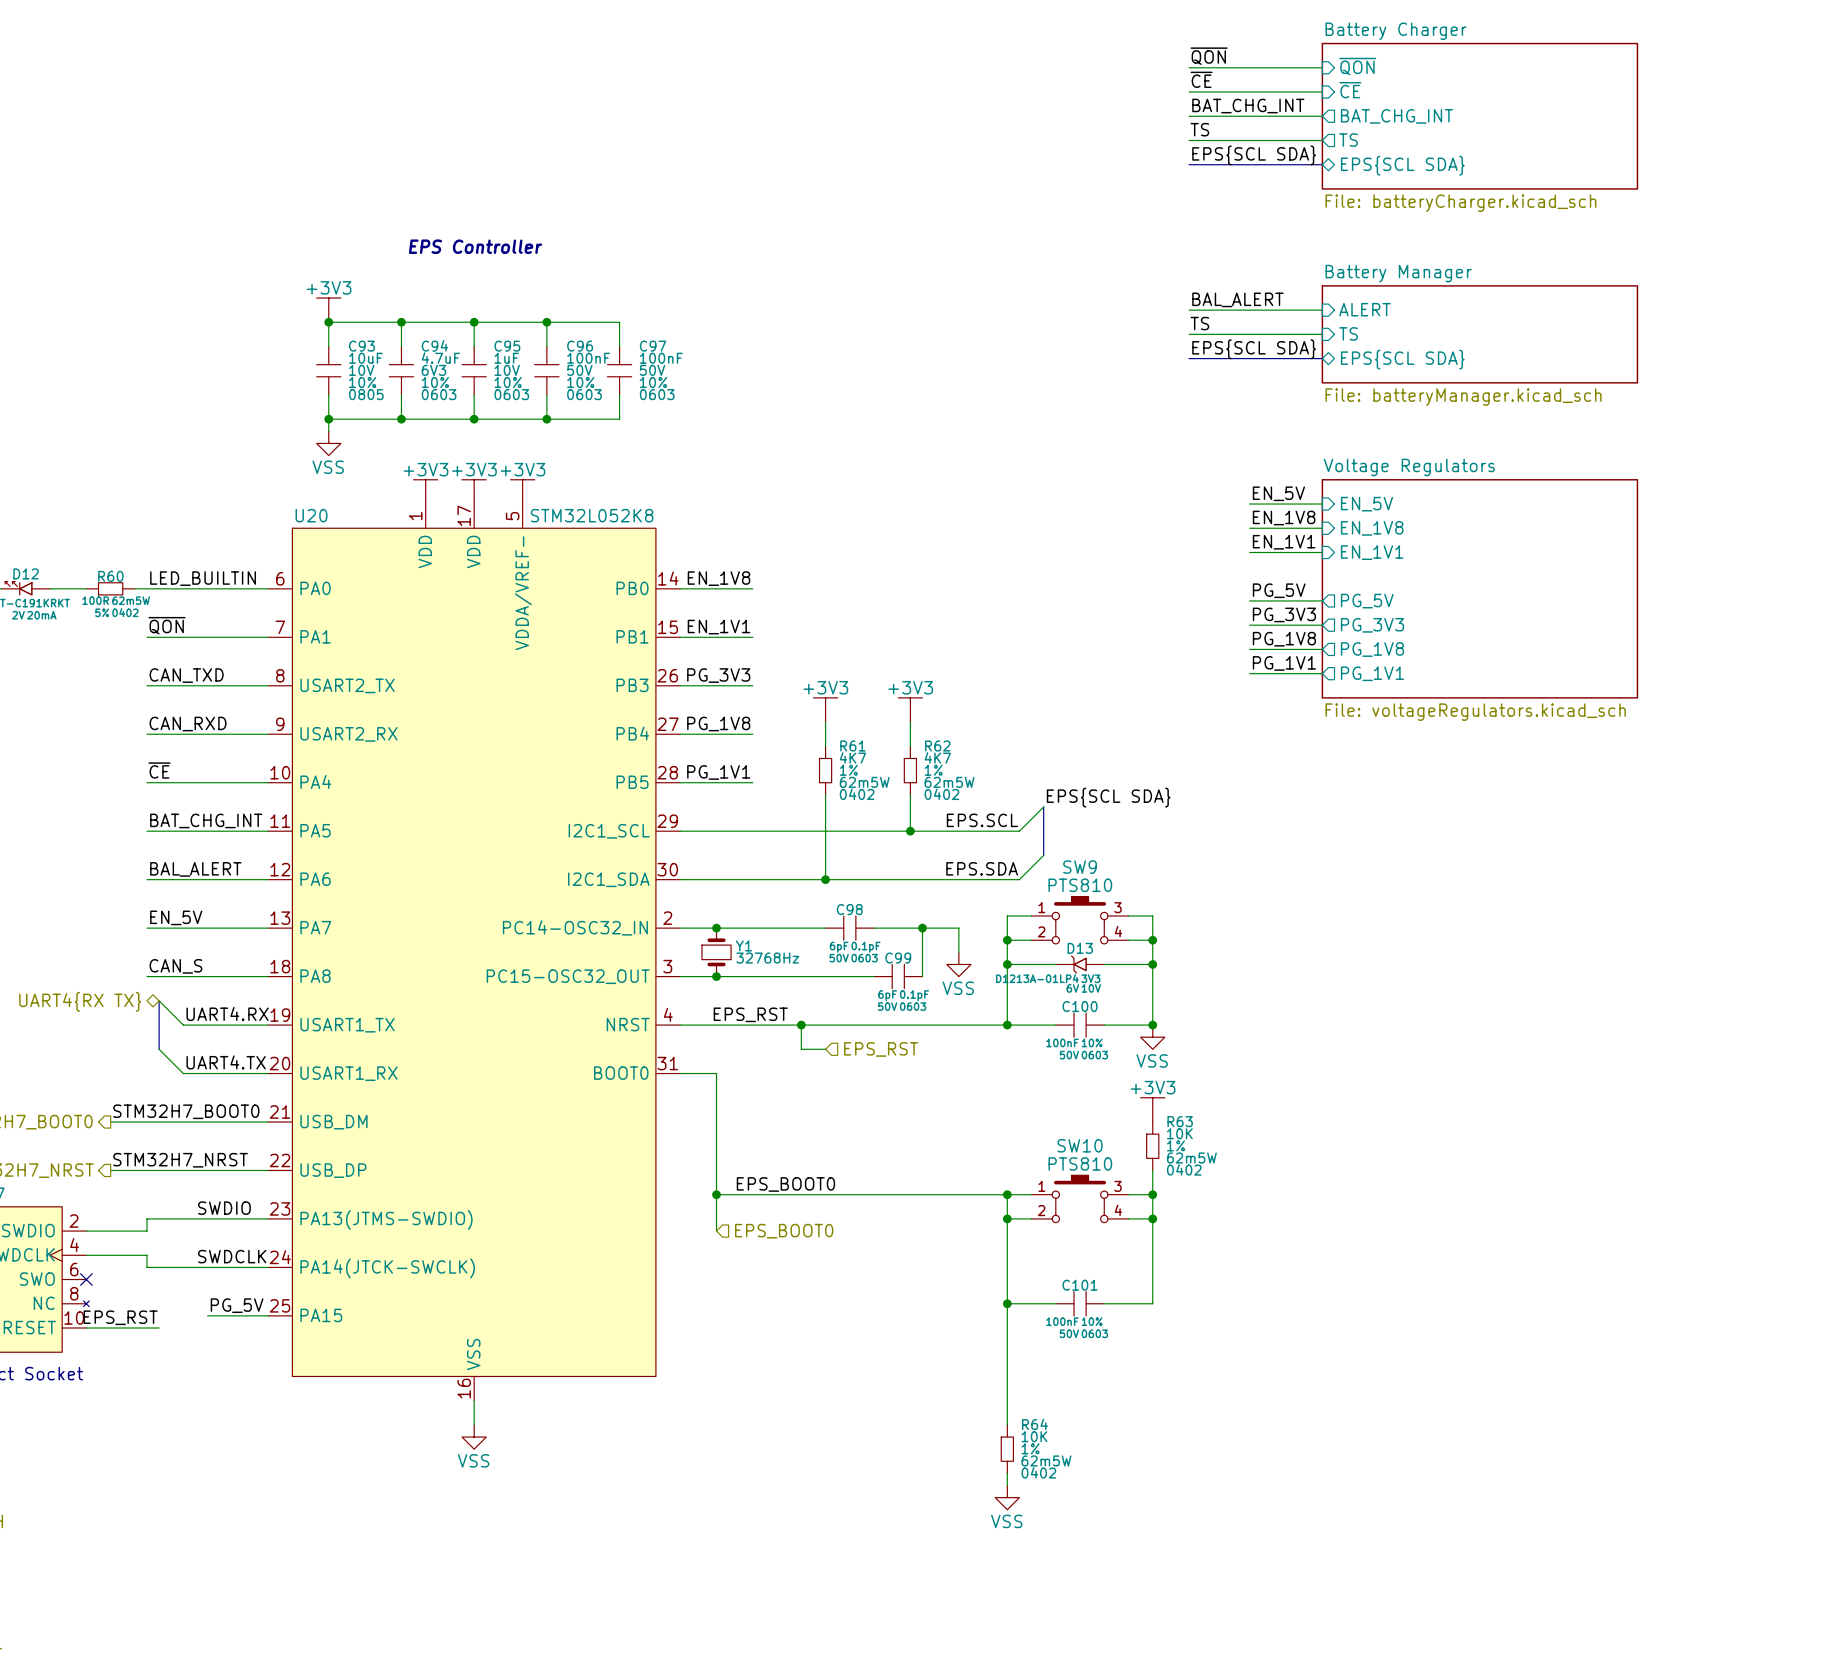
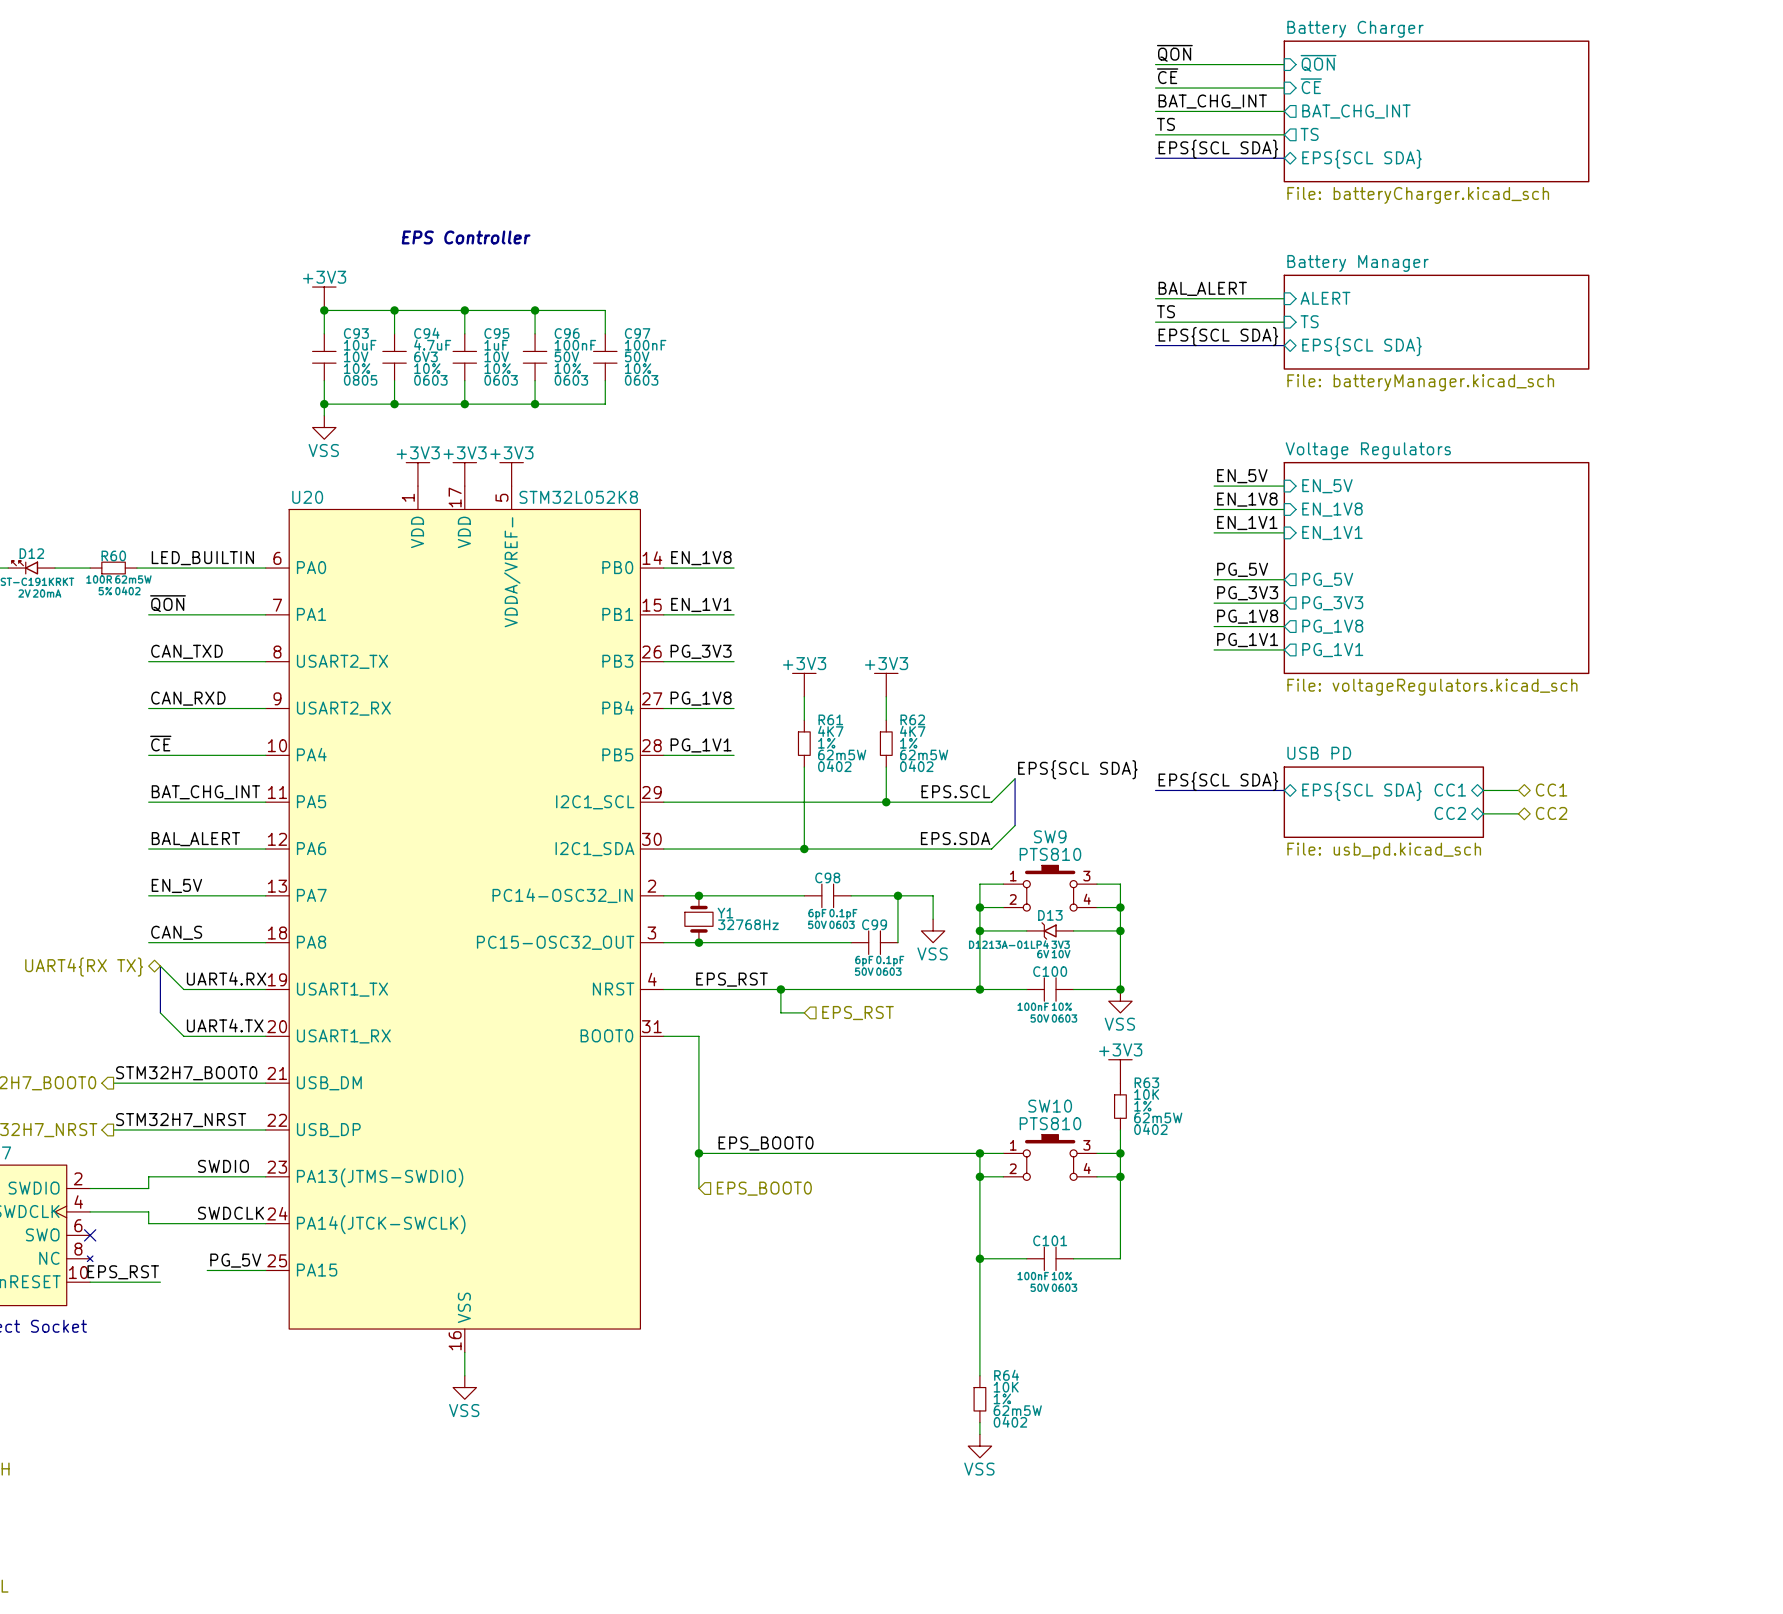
label: none -> EPS{SCL SDA} (1218, 781)
sheet pin: none -> CC1 (1450, 790)
hierarchical label: none -> CC1 (1551, 790)
bus: none -> (1155, 790) (1284, 790)
wire: none -> (1483, 790) (1518, 790)
sheet pin: none -> EPS{SCL SDA} (1362, 791)
sheet USB PD: none -> File: usb_pd.kicad_sch (1383, 802)
sheet pin: none -> CC2 (1450, 813)
hierarchical label: none -> CC2 (1551, 813)
wire: none -> (1483, 813) (1518, 813)

